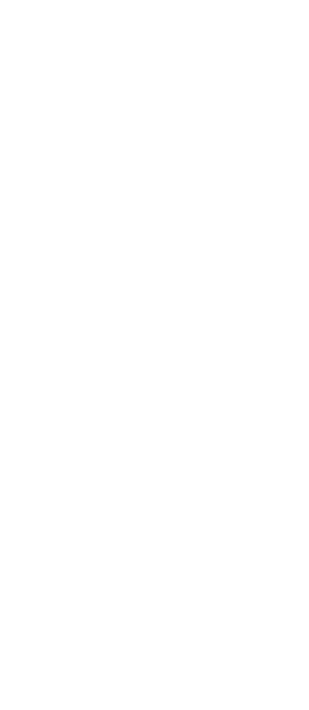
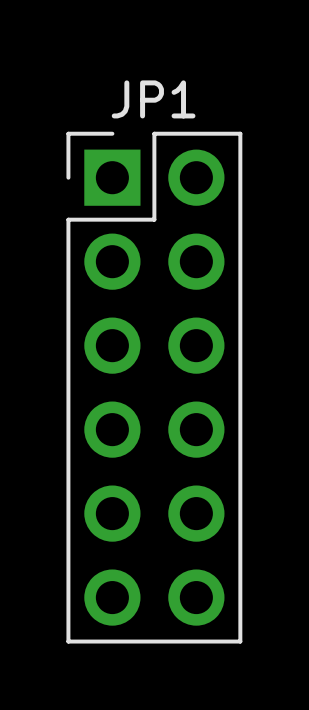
JP1: none -> (154, 387)

